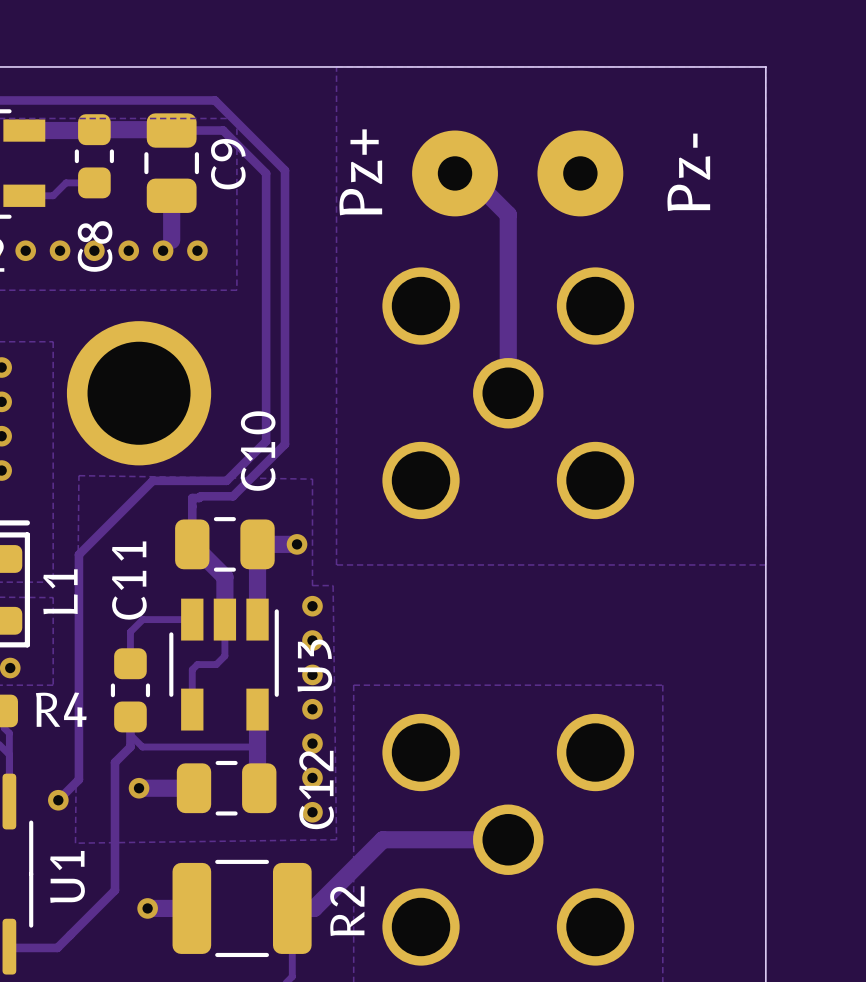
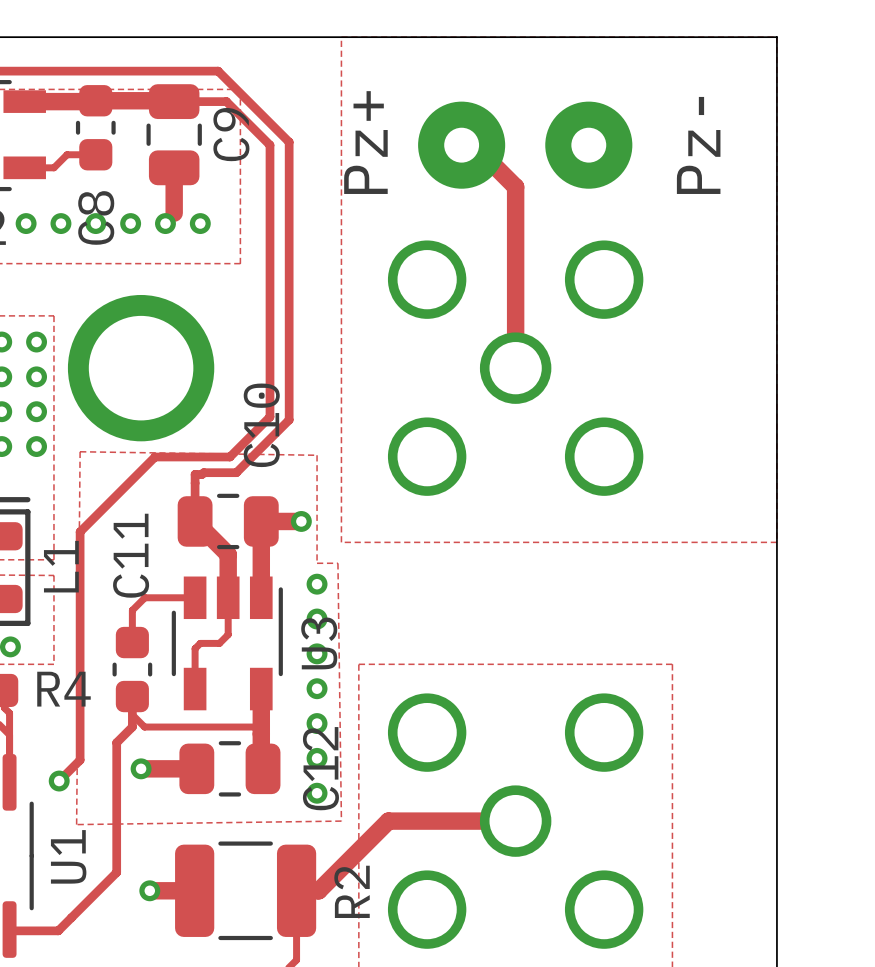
via: none -> (36, 342)
via: none -> (36, 376)
via: none -> (36, 411)
via: none -> (36, 446)

